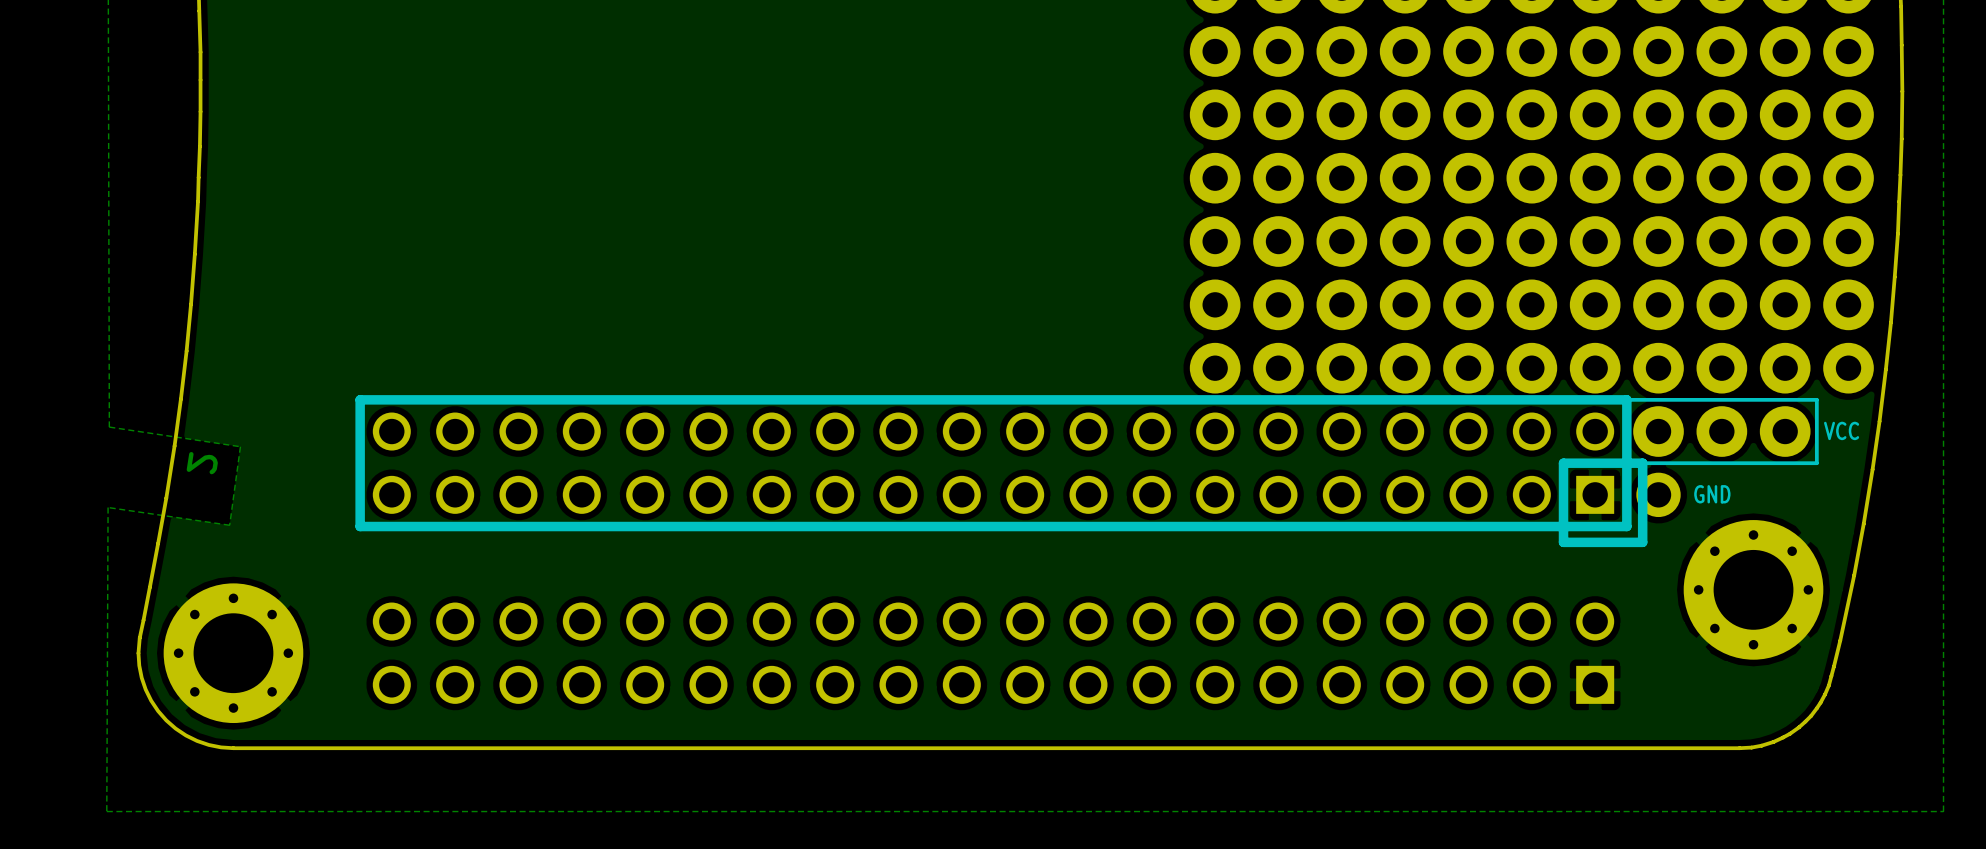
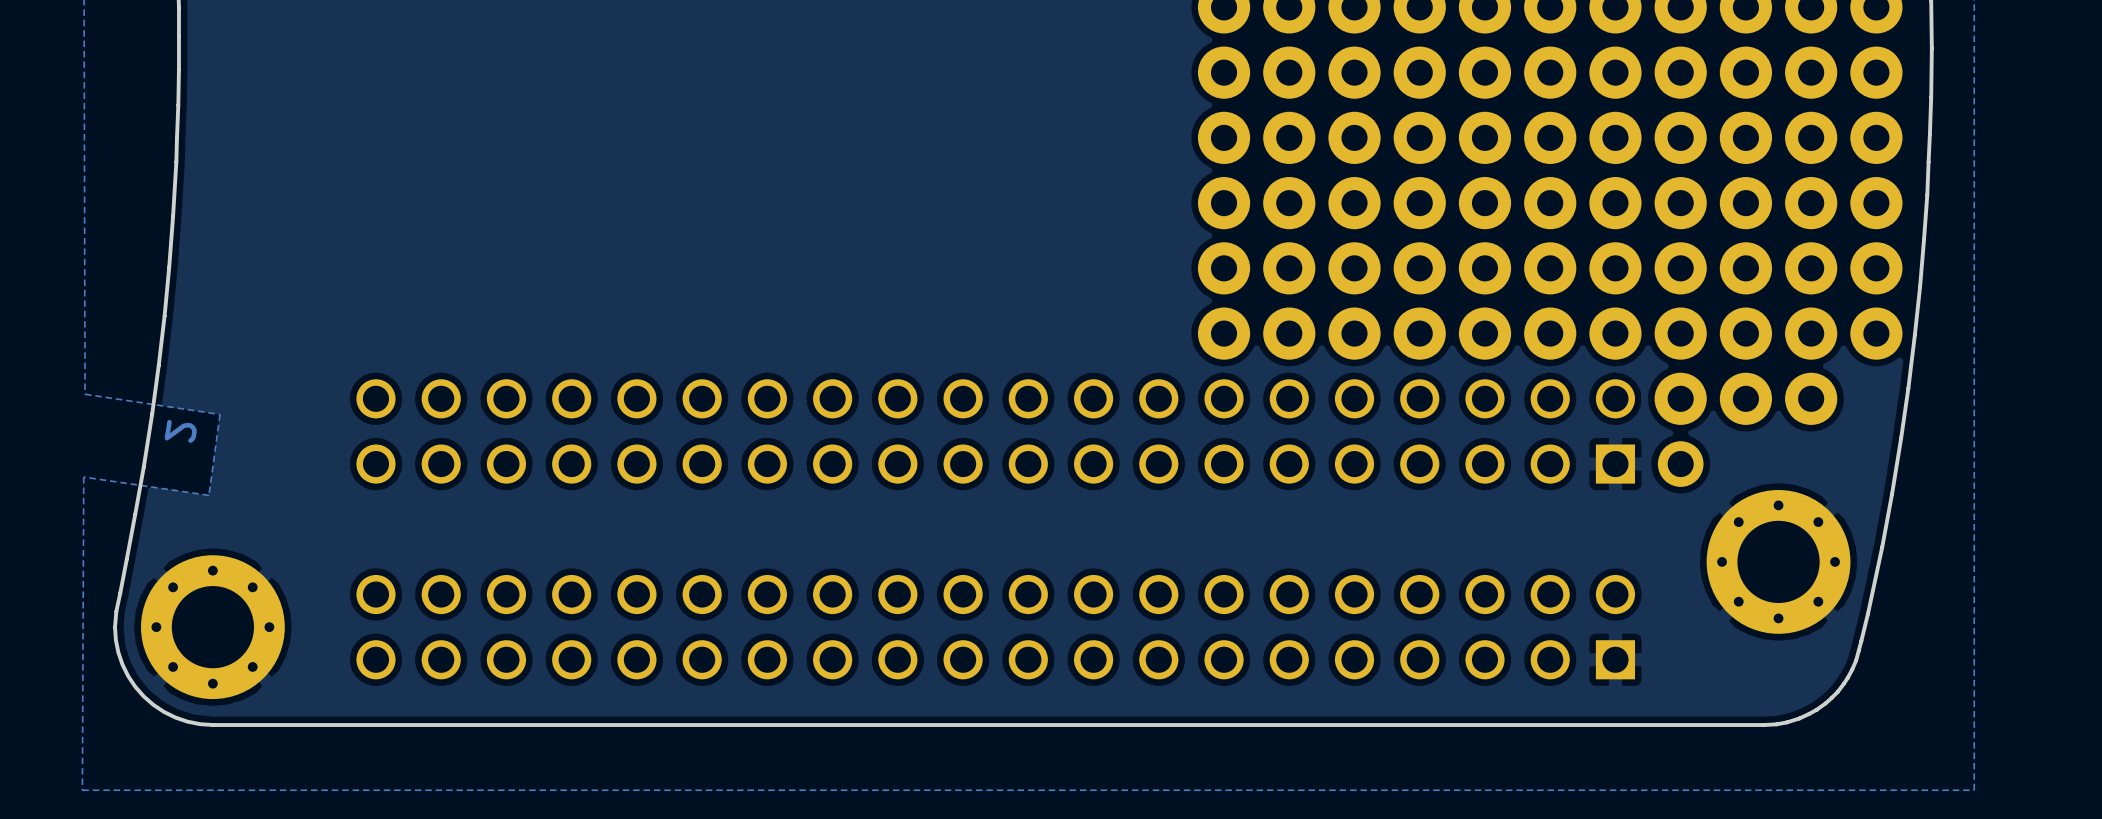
line: (1626, 399) (360, 399) (360, 526) (1626, 526) (1626, 399) -> none
line: (1626, 399) (1816, 399) (1816, 463) (1626, 463) -> none
text: VCC (1841, 430) -> none
line: (1642, 463) (1642, 542) (1563, 542) (1563, 463) (1642, 463) -> none
text: GND (1712, 494) -> none

